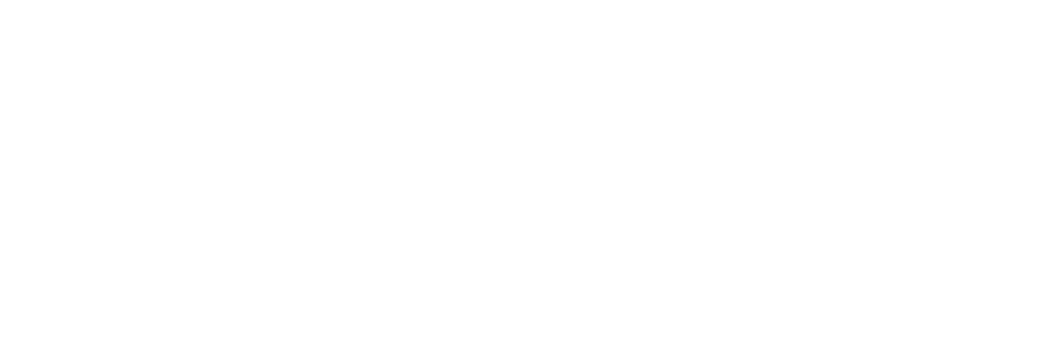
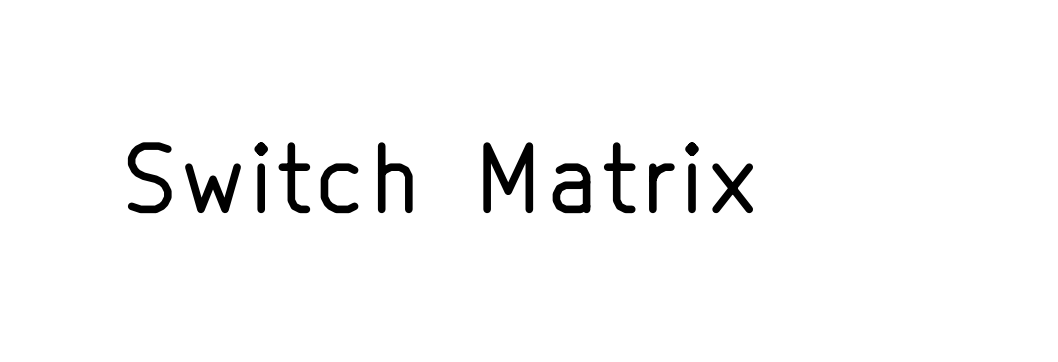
label: none -> Switch Matrix (440, 177)

